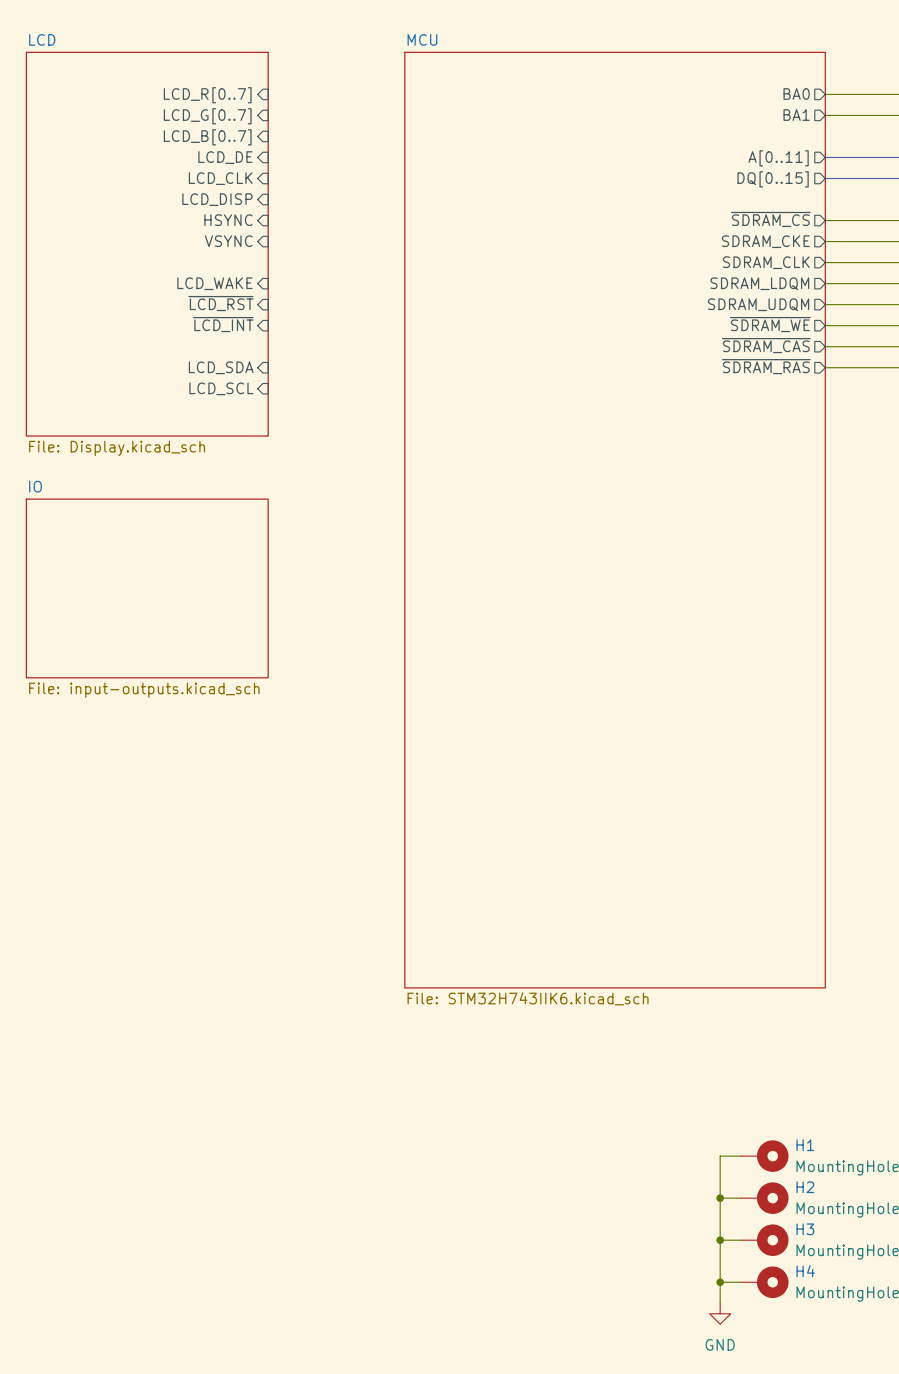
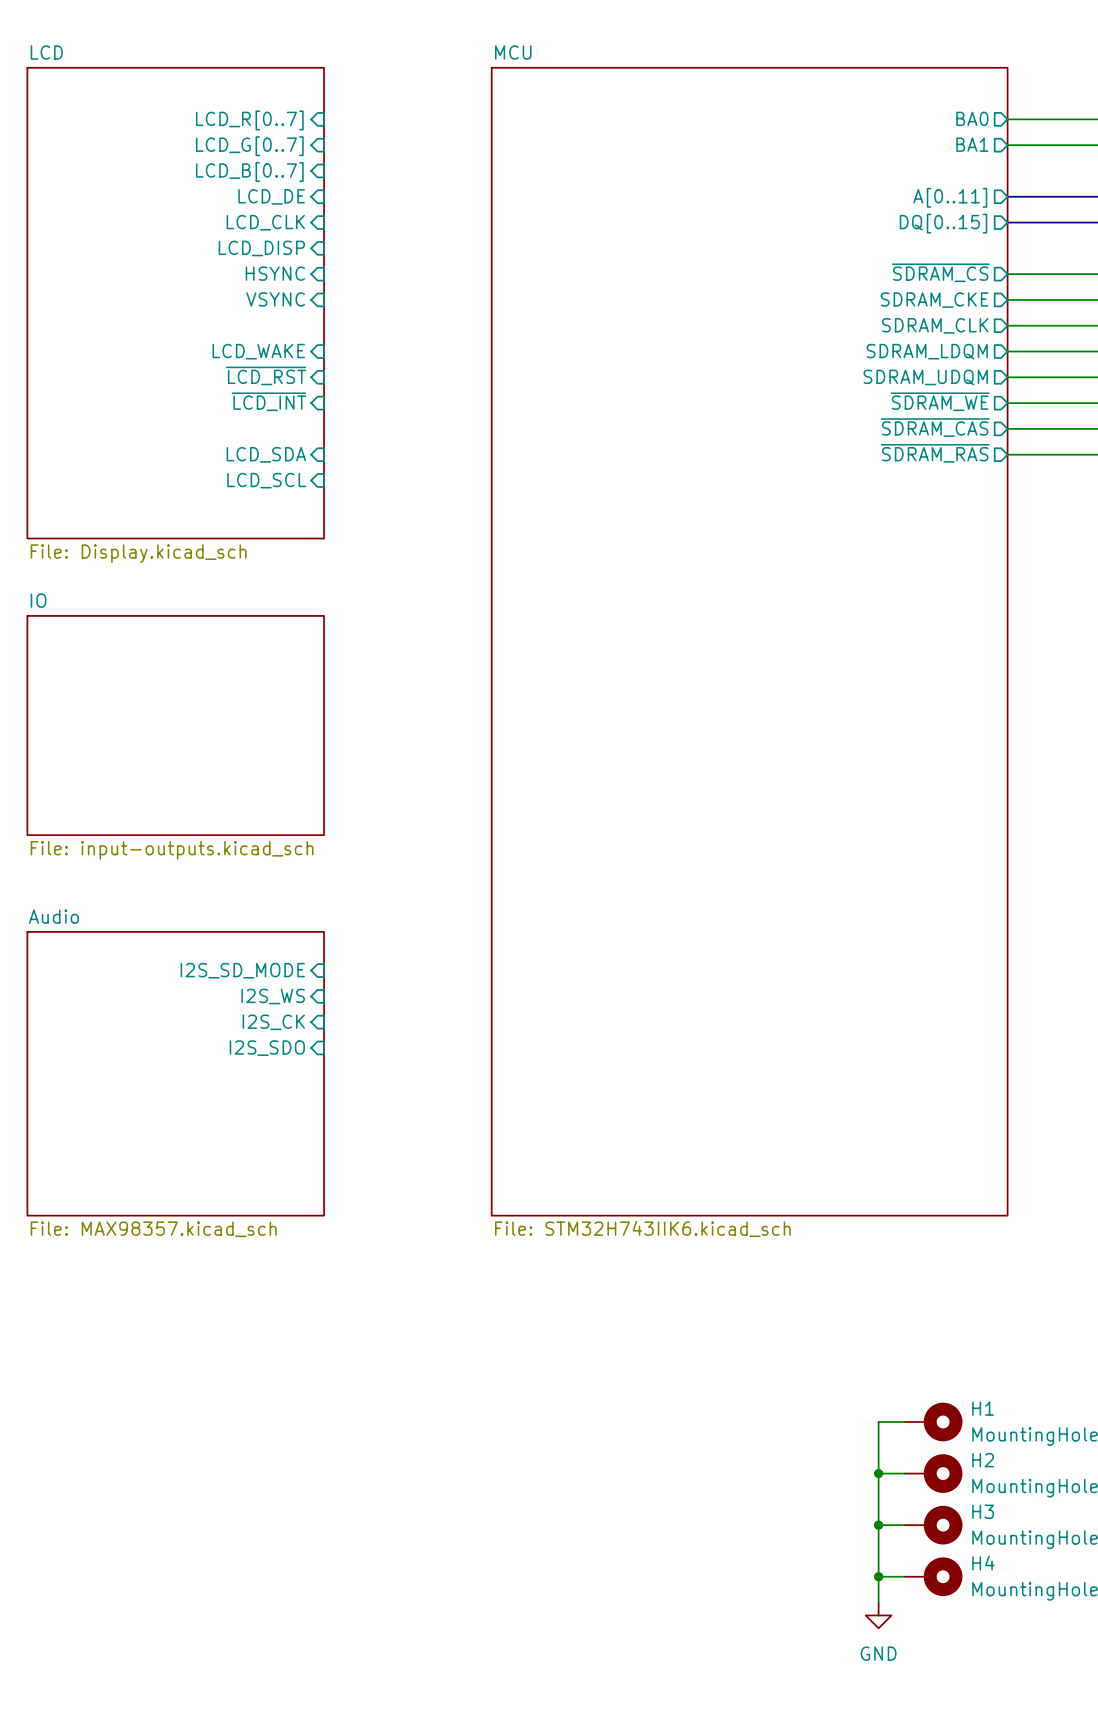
sheet pin: none -> I2S_SD_MODE (242, 970)
sheet pin: none -> I2S_WS (273, 996)
sheet pin: none -> I2S_CK (273, 1022)
sheet pin: none -> I2S_SDO (267, 1048)
sheet Audio: none -> File: MAX98357.kicad_sch (175, 1073)

